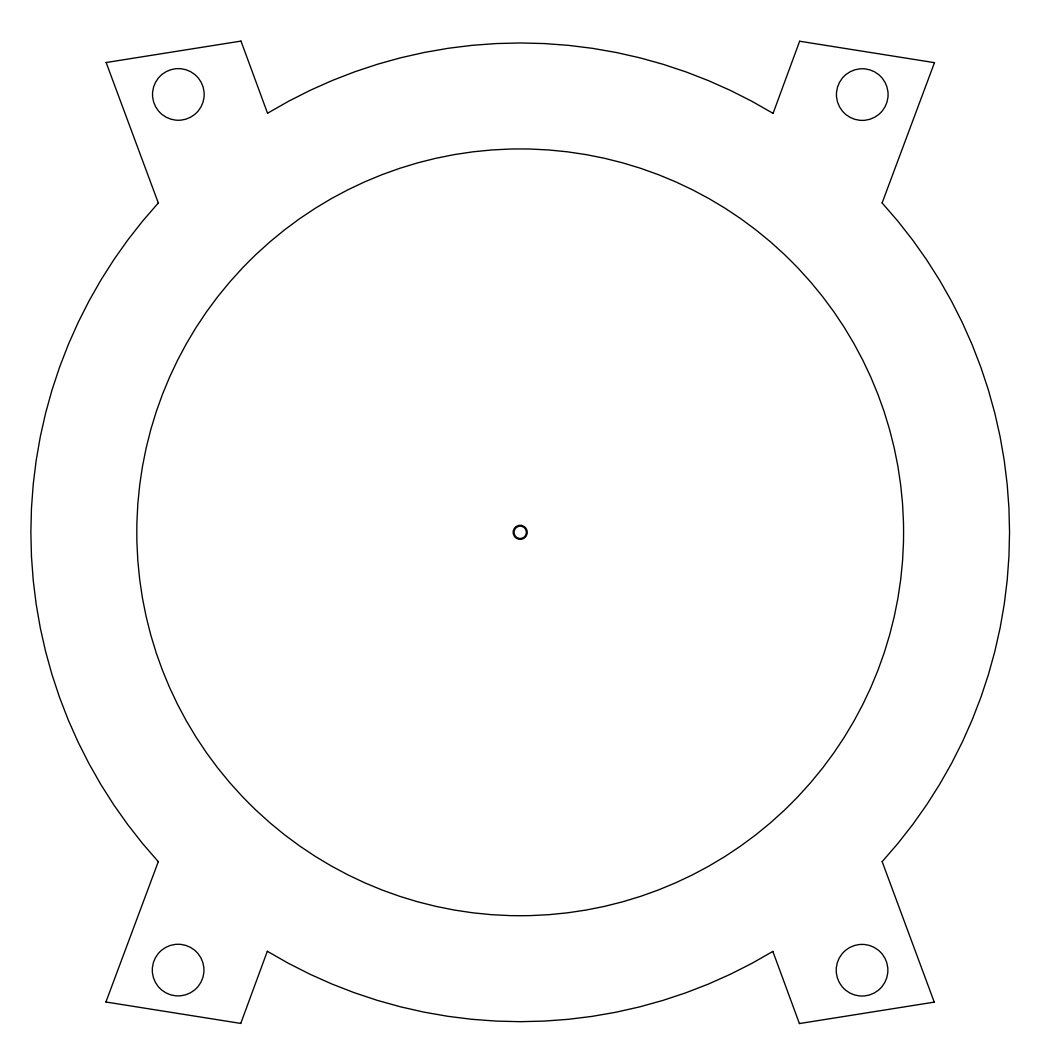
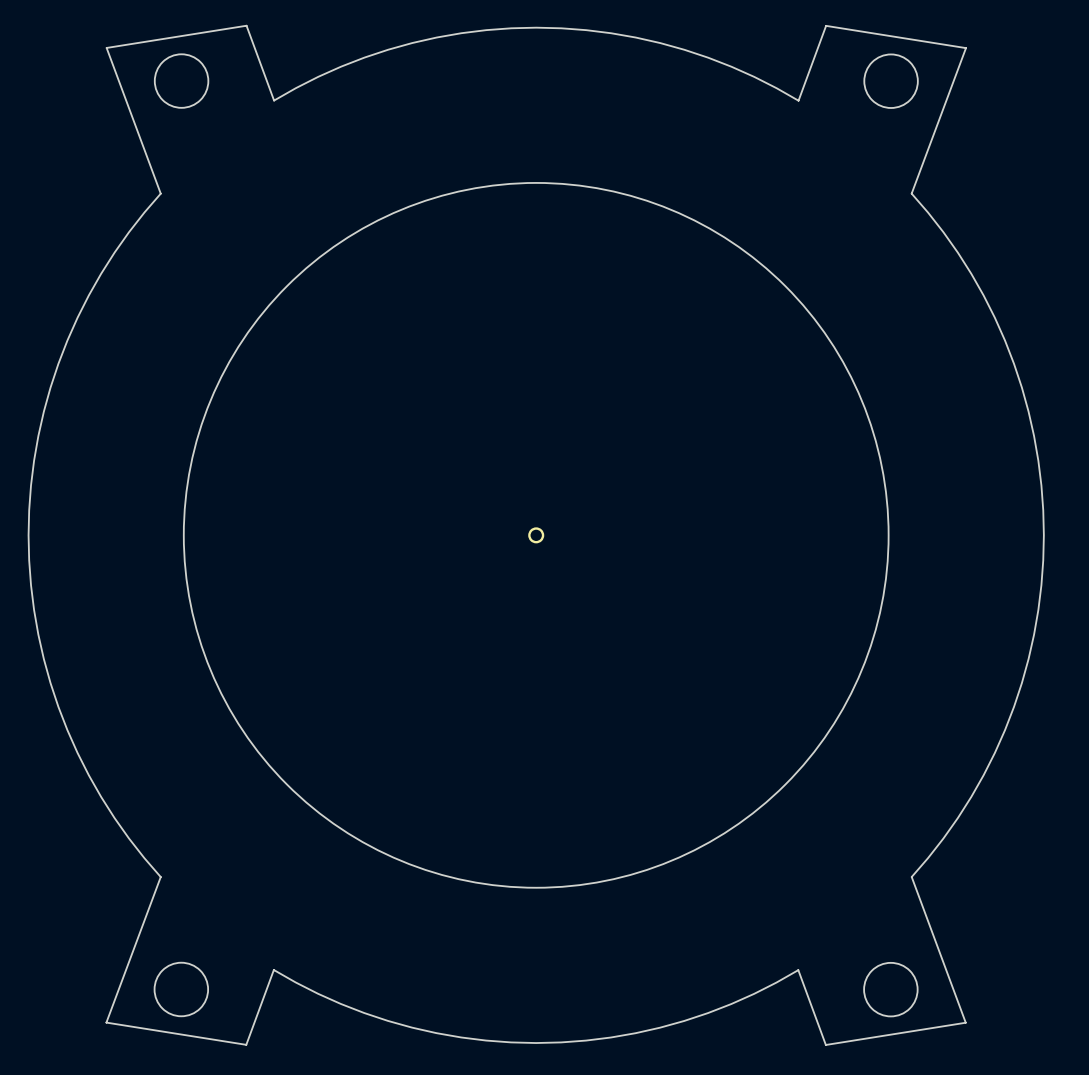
round board edge size: [136, 148, 905, 917] -> [183, 182, 890, 889]

